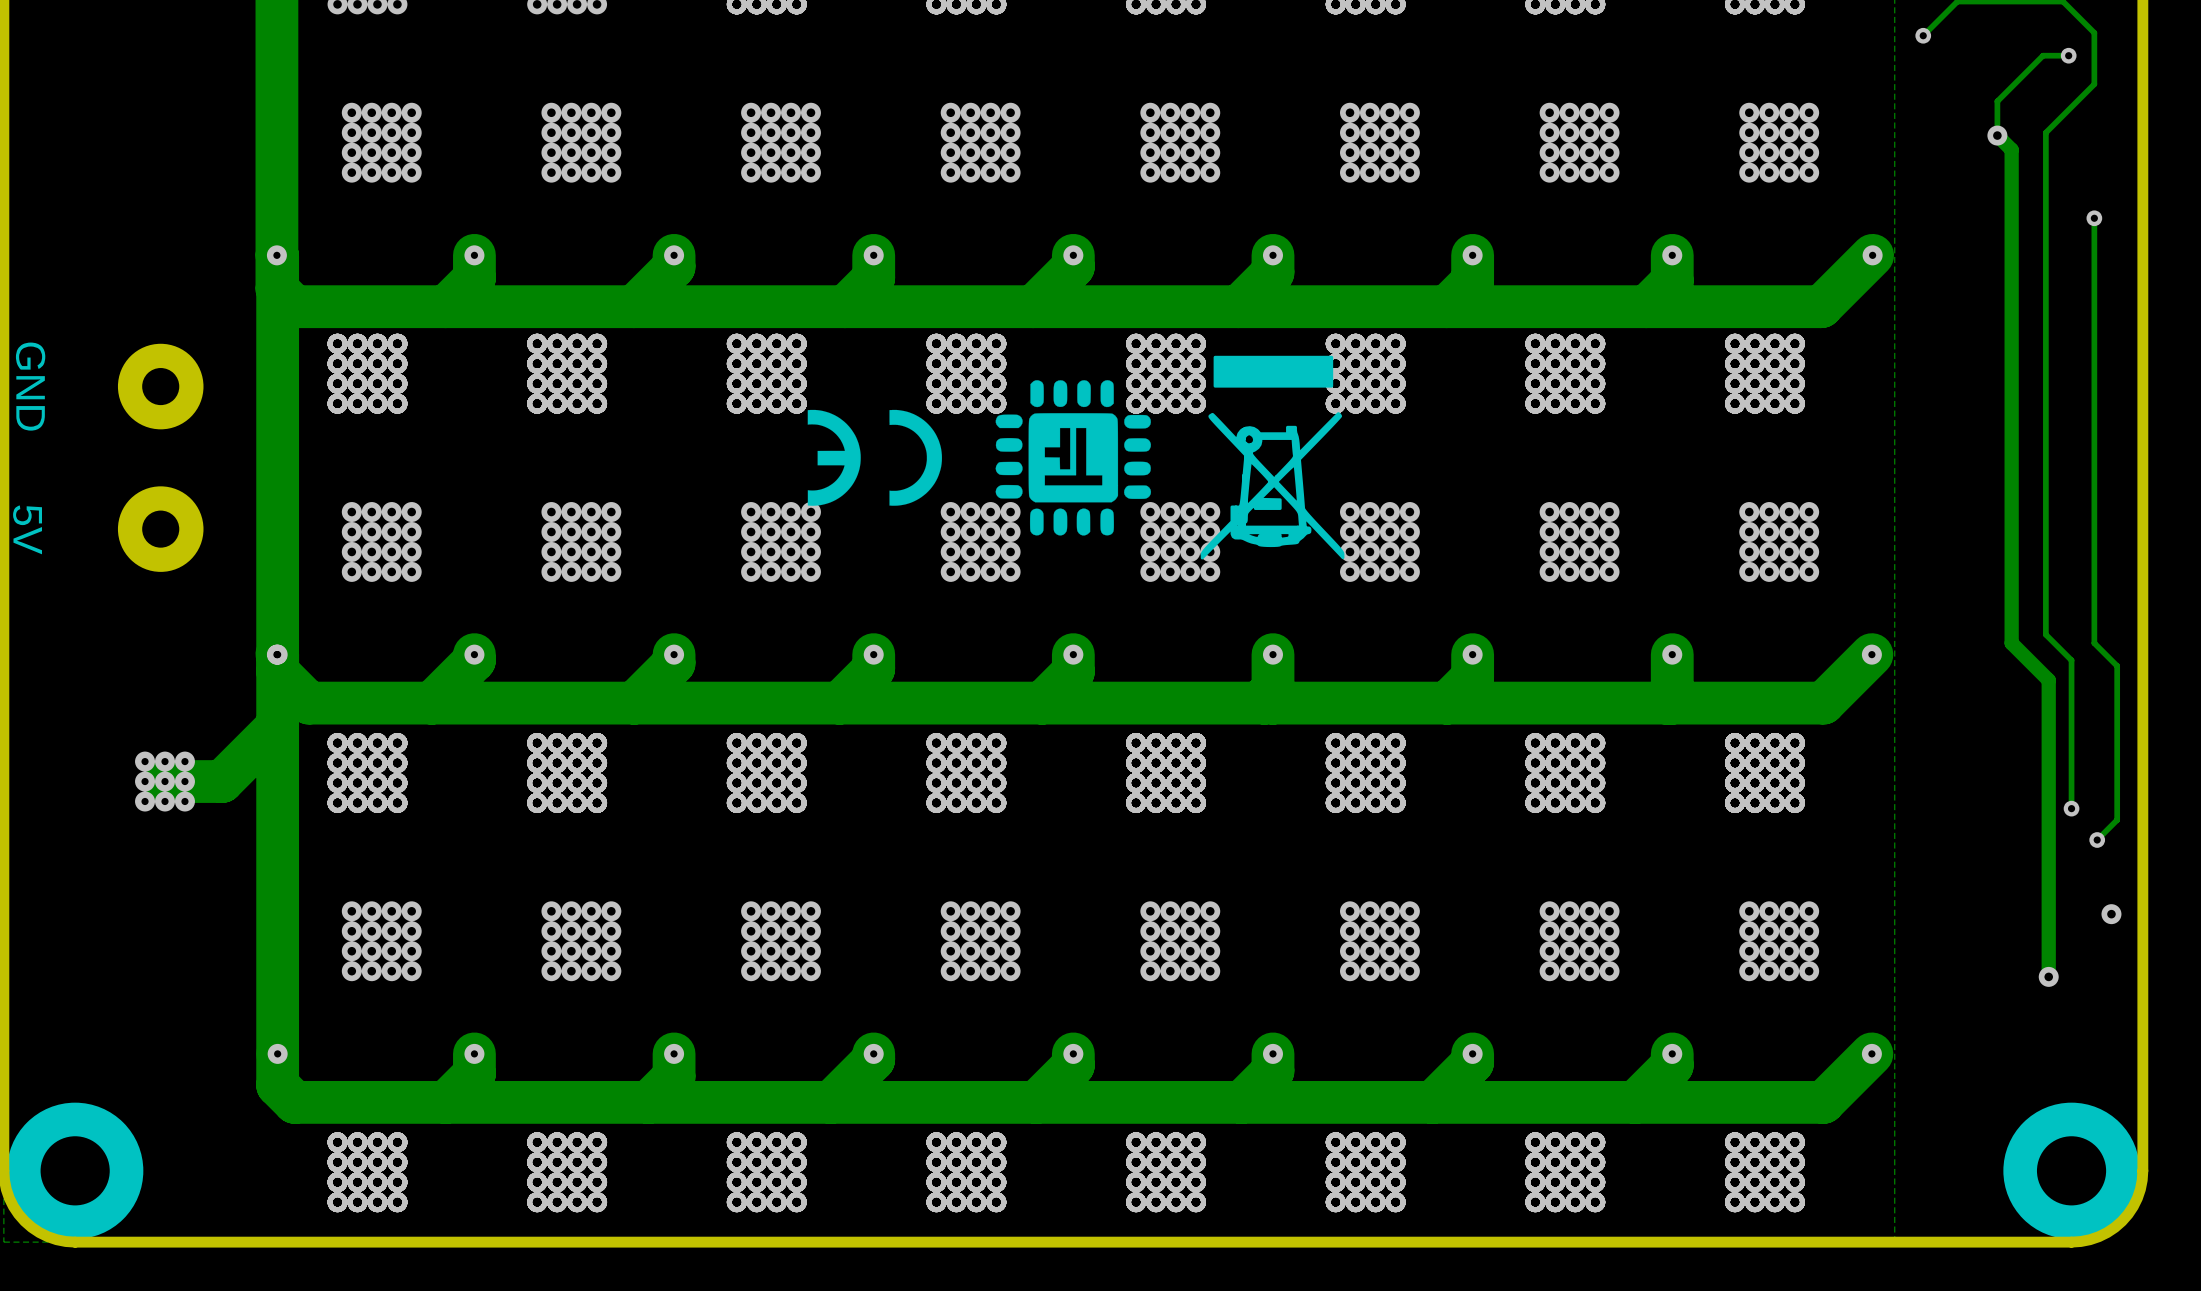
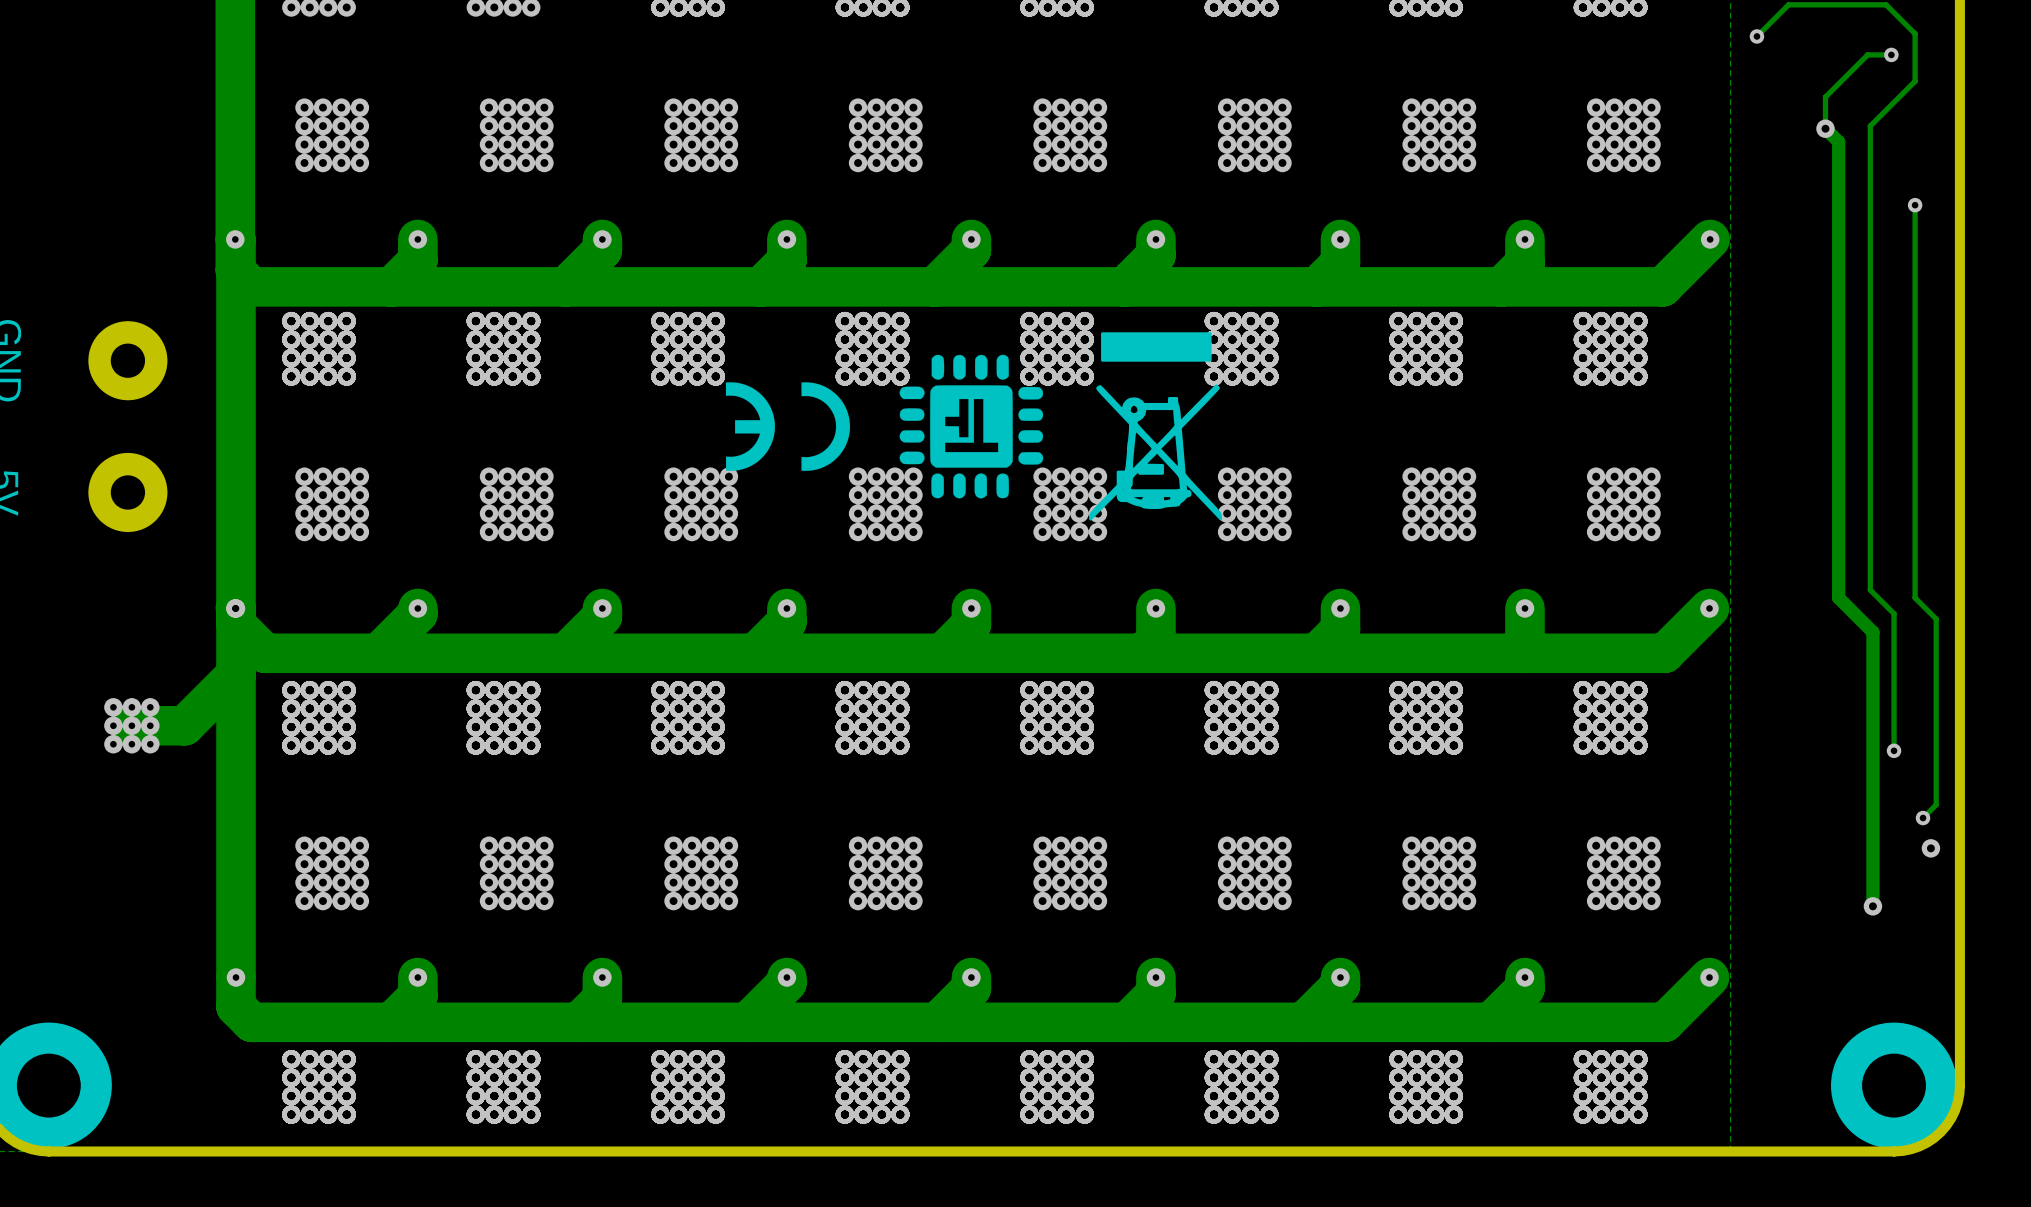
track: (2117, 820) (2097, 840) -> (1936, 761) (1936, 804) (1923, 818)
via position: (2097, 840) -> (1923, 818)

